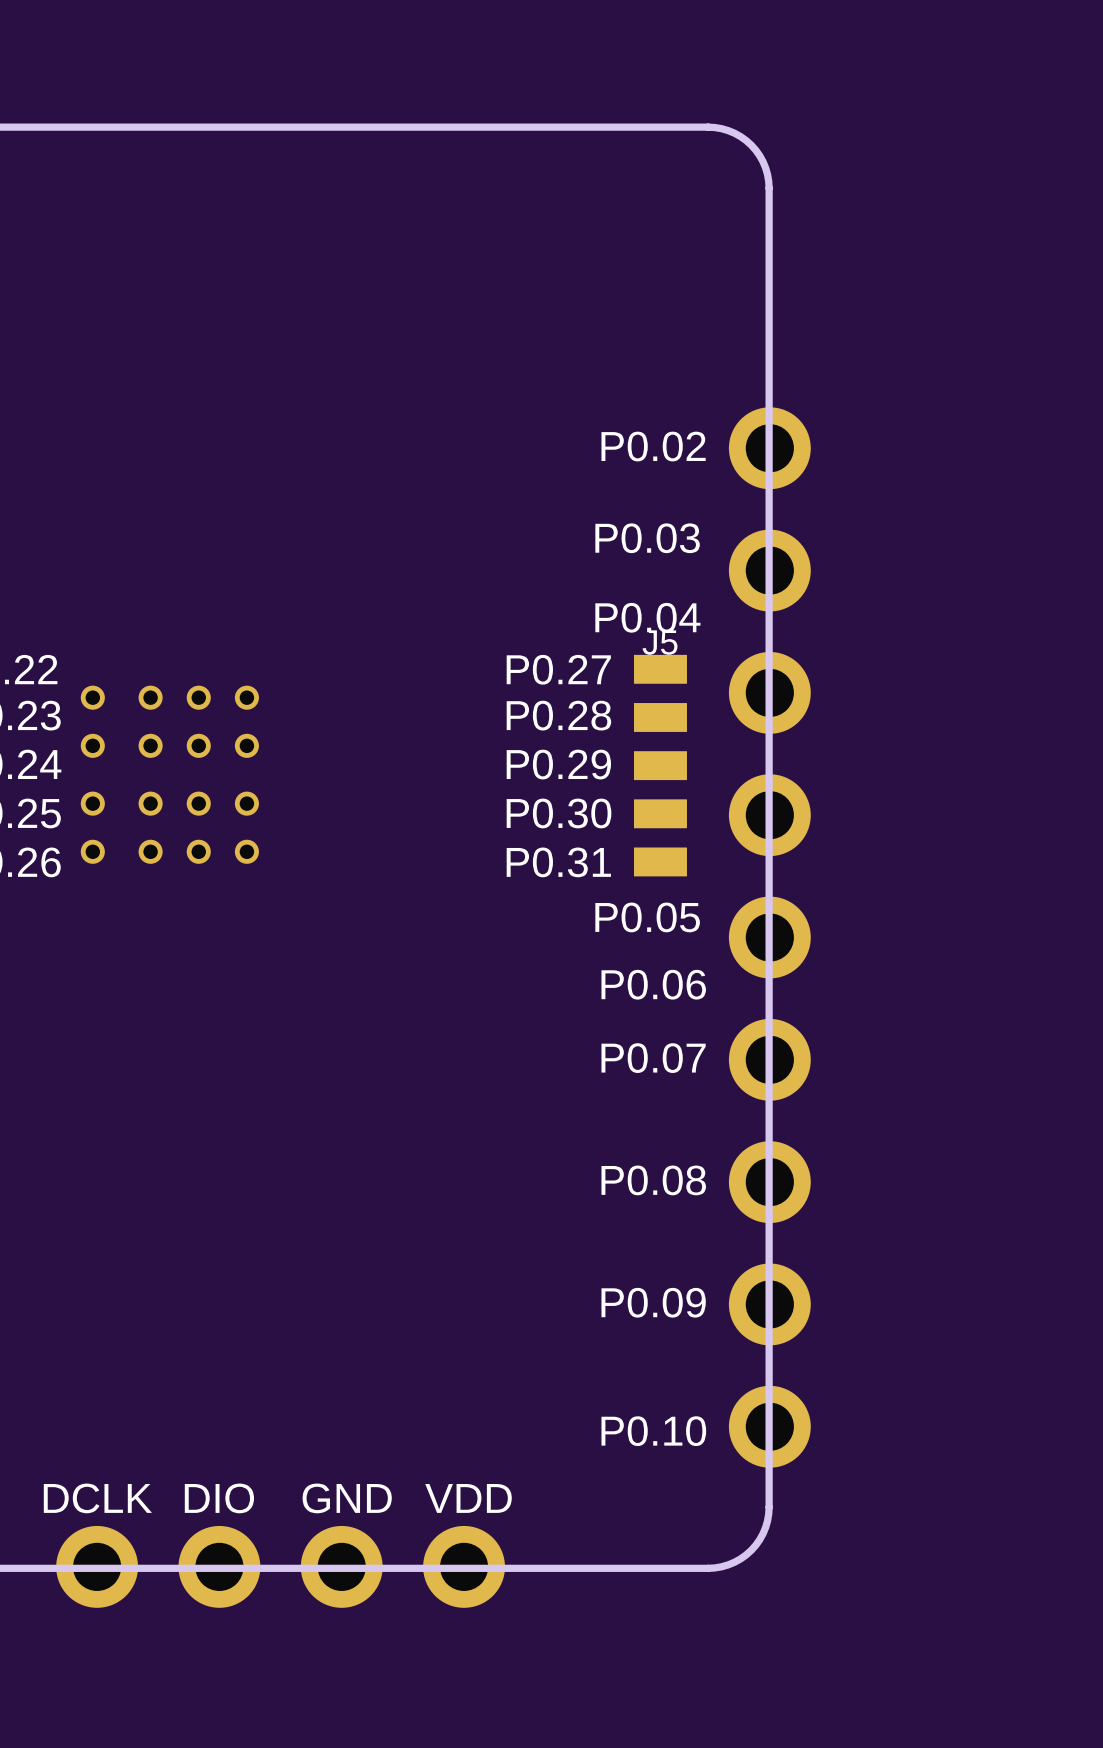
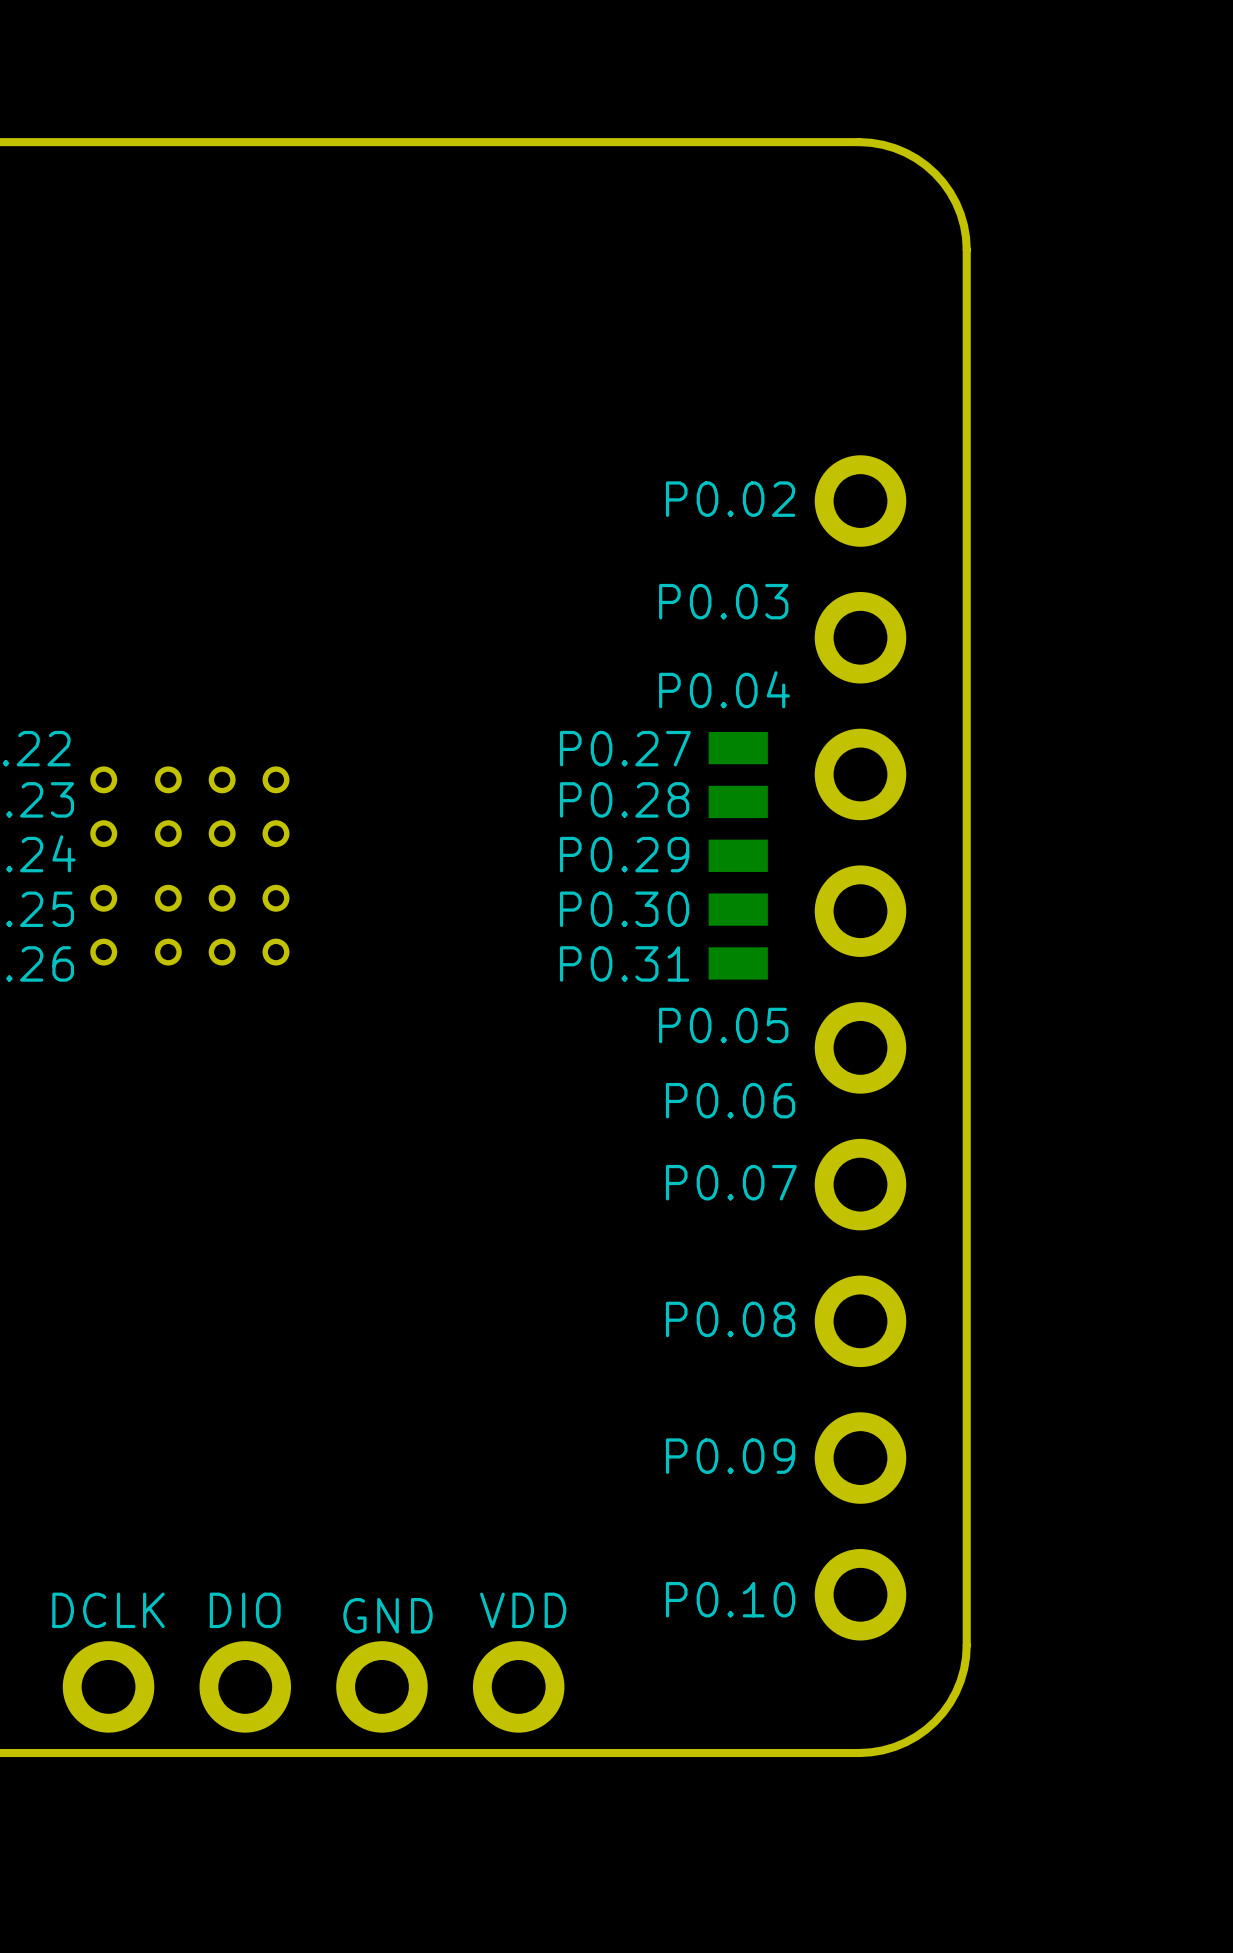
board edge: (707, 127) (728, 130) (740, 136) (751, 145) (759, 155) (765, 168) (769, 188) (769, 1507) (765, 1527) (759, 1539) (751, 1550) (740, 1558) (728, 1564) (707, 1568) -> (791, 142) (871, 142) (905, 152) (926, 165) (943, 182) (956, 203) (966, 237) (966, 1645) (960, 1680) (950, 1702) (935, 1721) (916, 1736) (894, 1746) (871, 1752) (791, 1753)
J5 name: J5 (660, 642) -> none
text position: DCLK (97, 1498) -> DCLK (108, 1610)
text position: DIO (219, 1498) -> DIO (245, 1610)
text position: GND (347, 1498) -> GND (388, 1615)
text position: VDD (468, 1498) -> VDD (523, 1610)
part position: (280, 1566) -> (313, 1686)

